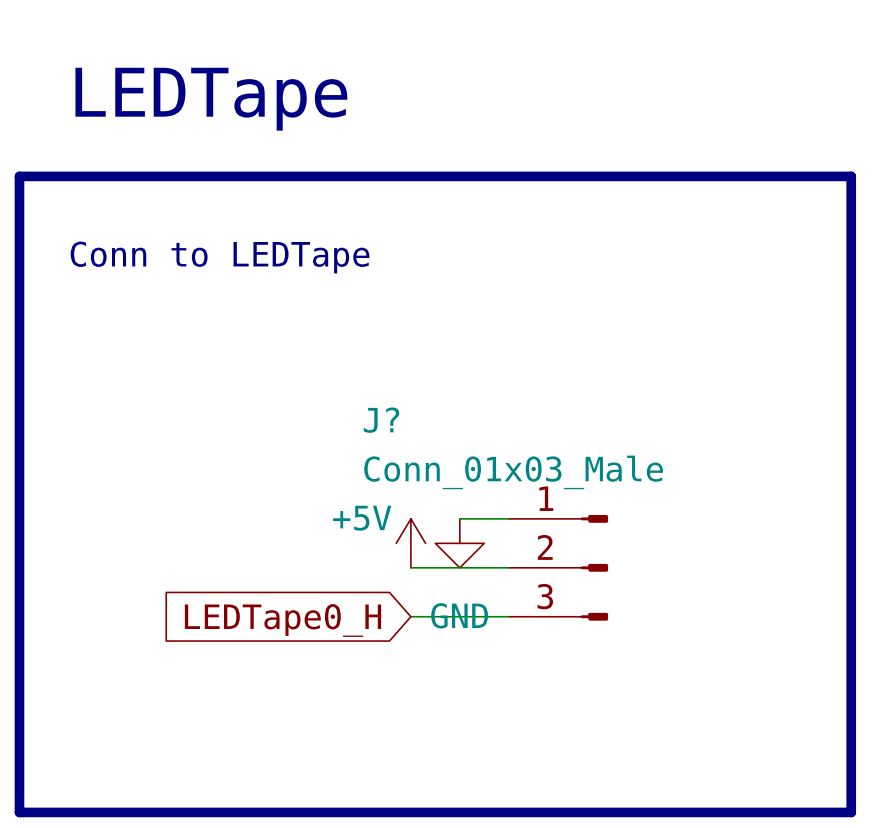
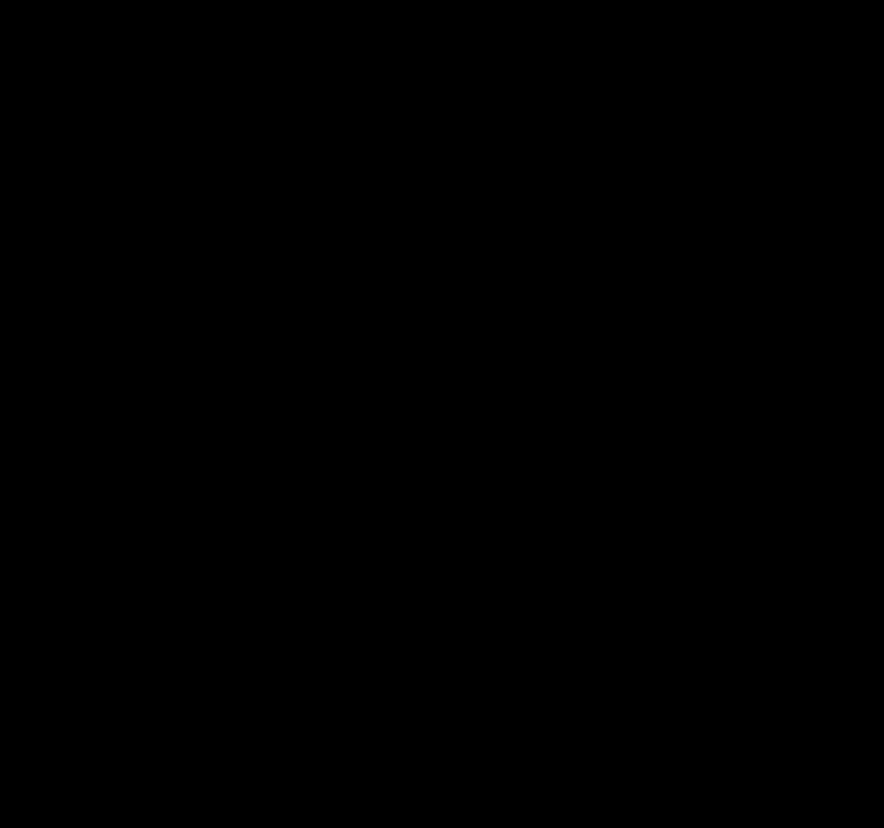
text: LEDTape (211, 99) -> none
line: (19, 176) (19, 812) (851, 812) (851, 176) (19, 176) -> none
text: Conn to LEDTape (220, 257) -> none
wire: (459, 518) (508, 518) -> none
power symbol: +5V (410, 543) -> none
power symbol: GND (459, 543) -> none
wire: (410, 567) (508, 567) -> none
J?: Conn_01x03_Male (558, 567) -> none
wire: (410, 616) (508, 616) -> none
global label: LEDTape0_H (283, 620) -> none

